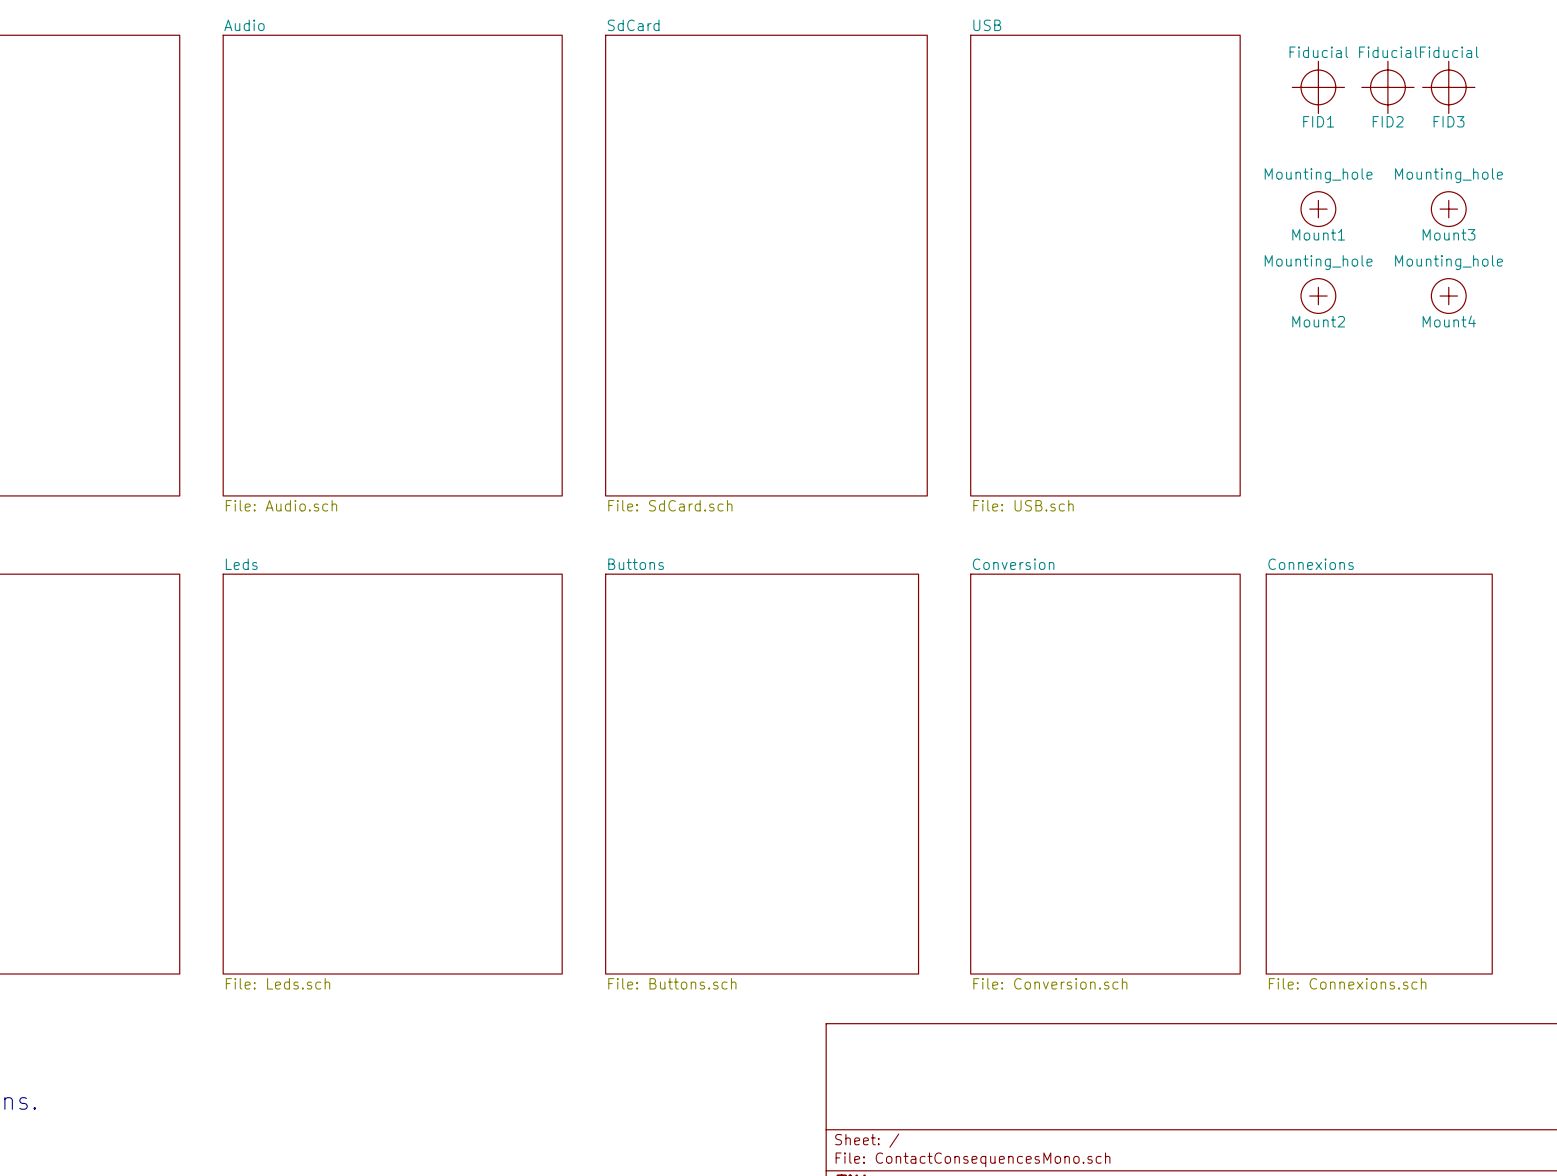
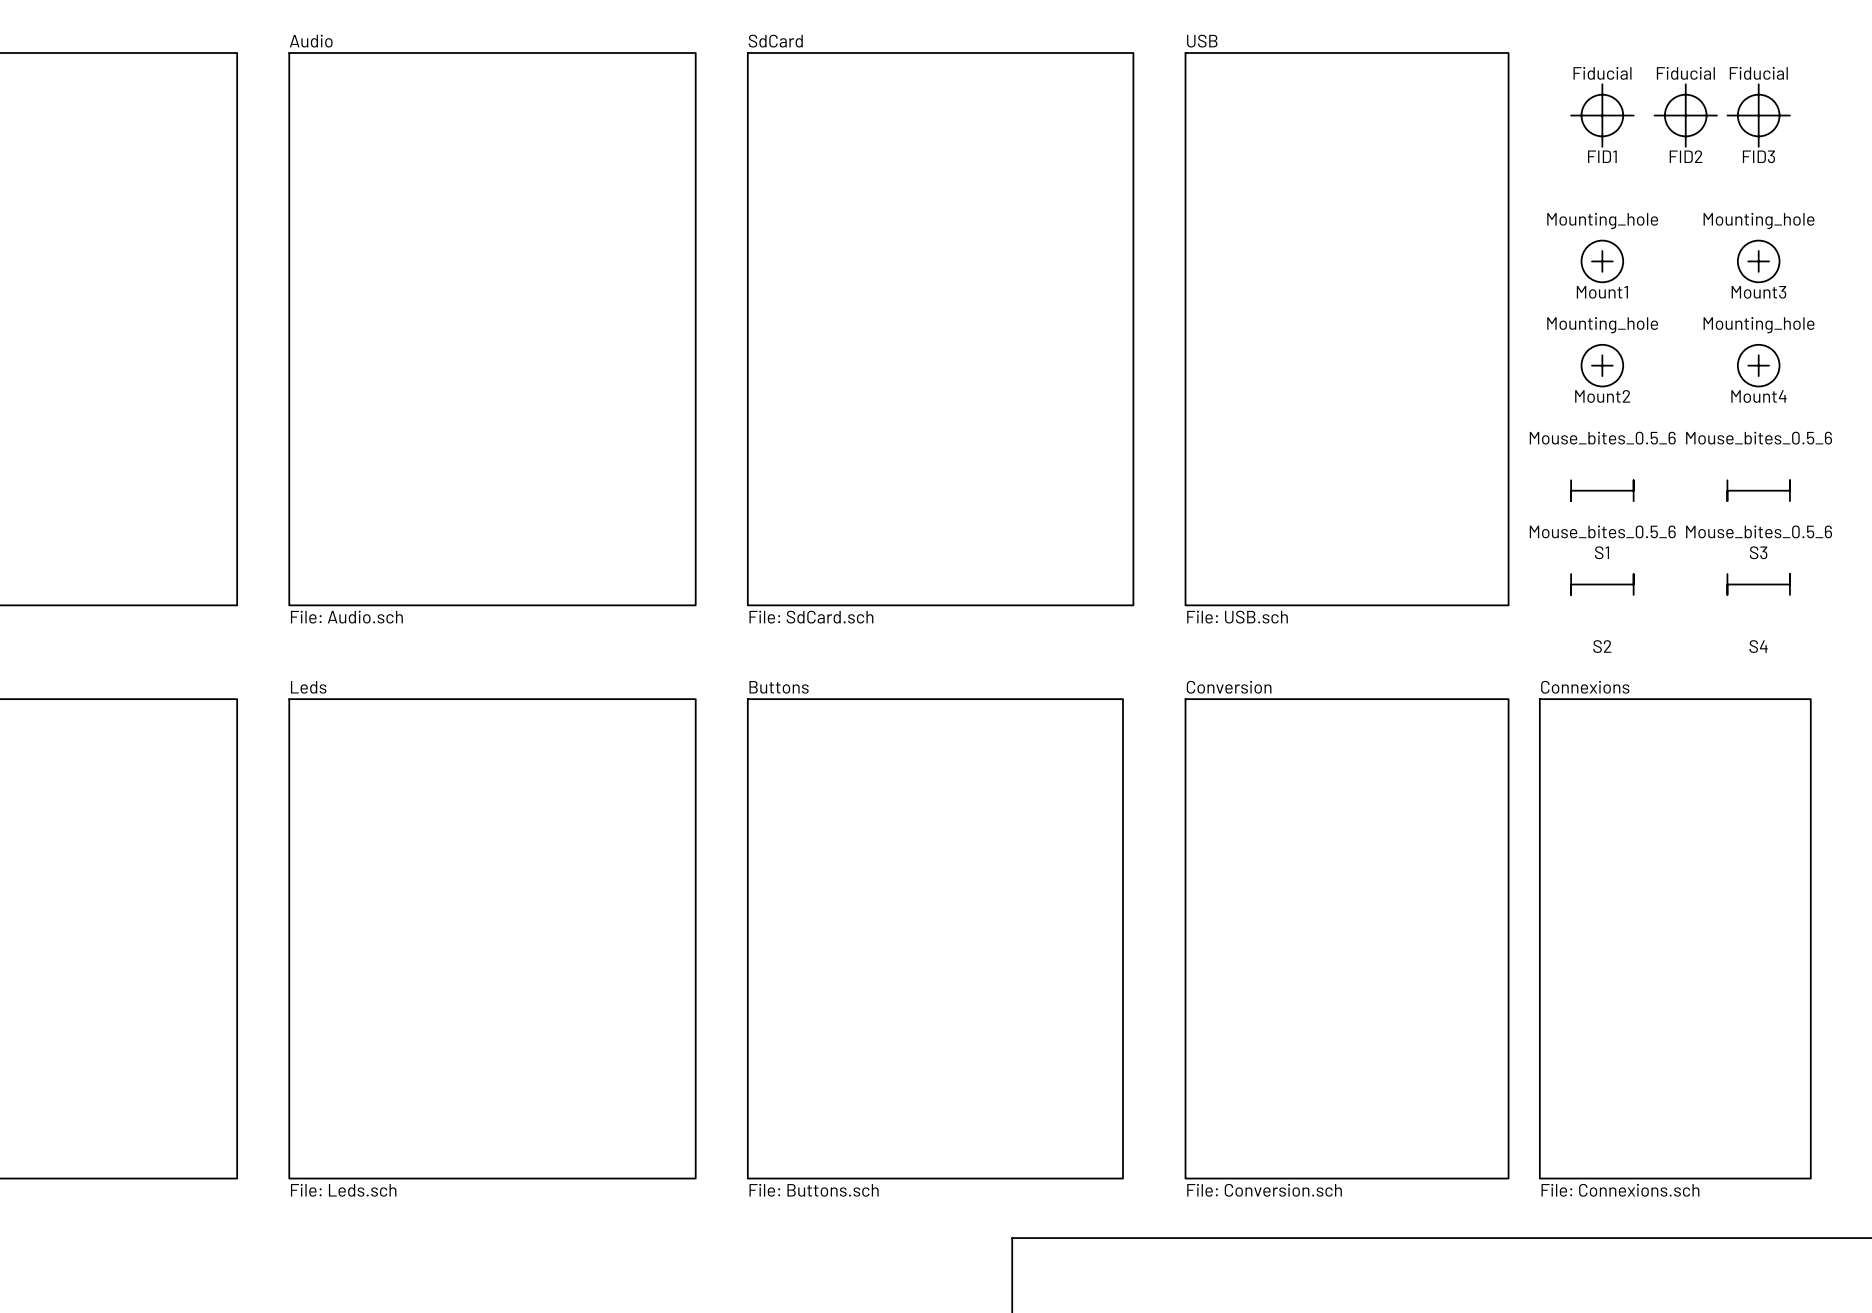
S1: none -> Mouse_bites_0.5_6 (1602, 490)
S3: none -> Mouse_bites_0.5_6 (1758, 490)
S2: none -> Mouse_bites_0.5_6 (1602, 584)
S4: none -> Mouse_bites_0.5_6 (1758, 584)

